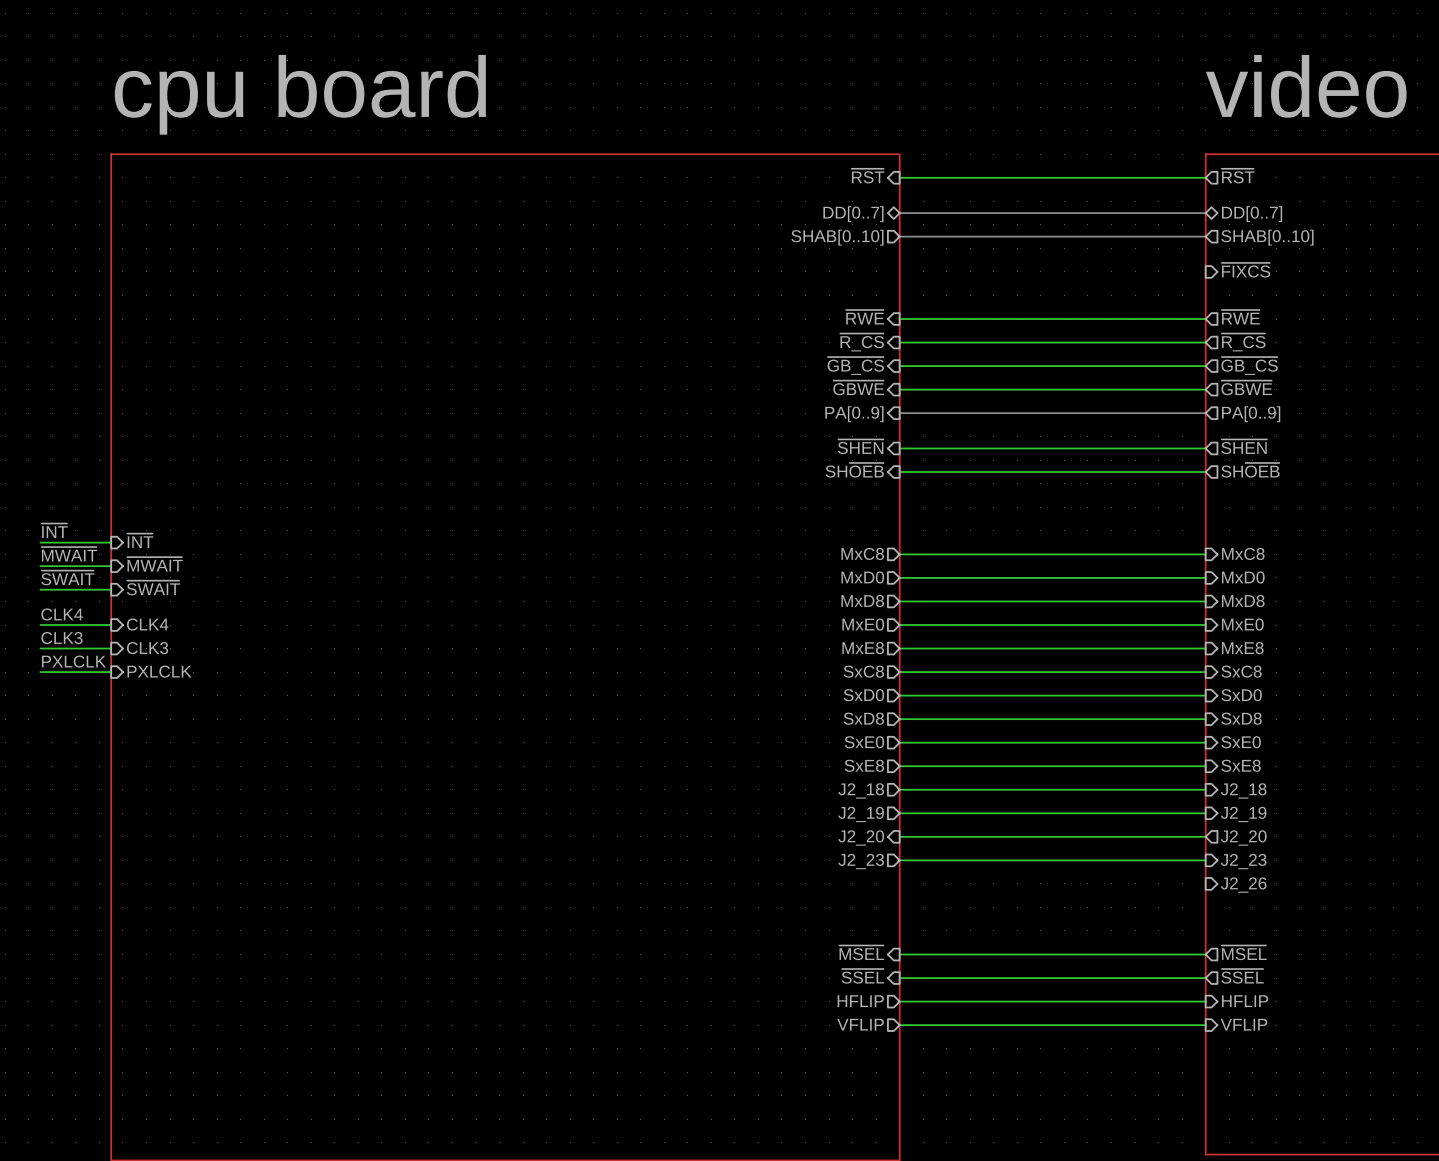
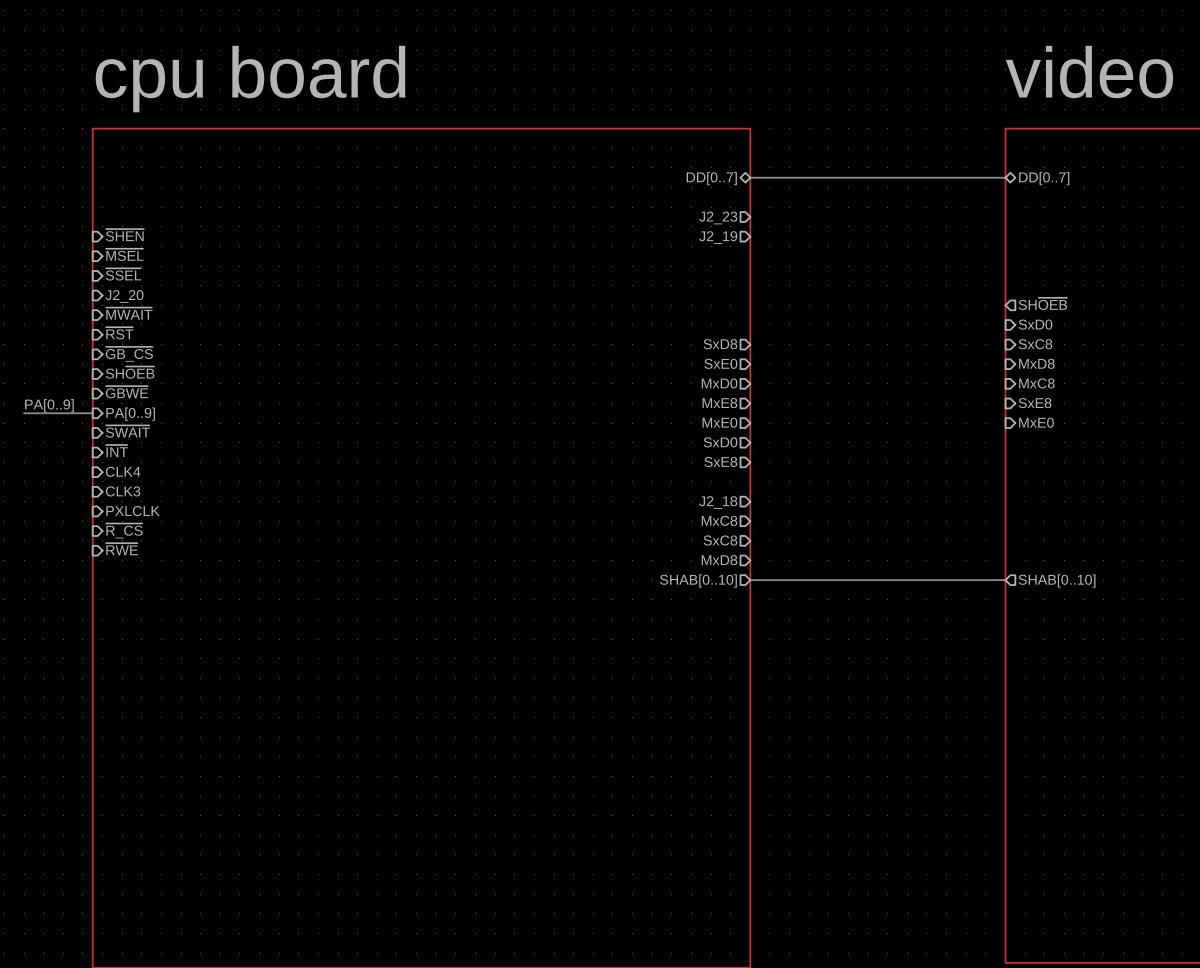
sheet pin: ~{RST} (868, 176) -> none
sheet pin: ~{RST} (1238, 176) -> none
wire: (899, 177) (1205, 177) -> none
bus: (899, 236) (1205, 236) -> none
sheet pin: SHAB[0..10] (837, 237) -> none
sheet pin: SHAB[0..10] (1267, 237) -> none
sheet pin: none -> J2_23 (718, 217)
sheet pin: ~{FIXCS} (1245, 270) -> none
sheet pin: none -> ~{SHEN} (124, 235)
sheet pin: none -> J2_19 (718, 237)
sheet pin: none -> ~{MSEL} (124, 254)
sheet pin: ~{RWE} (865, 317) -> none
sheet pin: ~{RWE} (1240, 317) -> none
wire: (899, 319) (1205, 319) -> none
sheet pin: none -> ~{SSEL} (123, 274)
sheet pin: ~{R_CS} (862, 342) -> none
wire: (899, 342) (1205, 342) -> none
sheet pin: ~{R_CS} (1243, 342) -> none
sheet pin: none -> J2_20 (124, 296)
sheet pin: ~{GB_CS} (855, 366) -> none
wire: (899, 366) (1205, 366) -> none
sheet pin: ~{GB_CS} (1249, 366) -> SH~{OEB} (1042, 303)
sheet pin: none -> ~{MWAIT} (129, 313)
sheet pin: ~{GBWE} (858, 387) -> none
sheet pin shape: output (1246, 387) -> input (1035, 324)
sheet pin: ~{GBWE} (1246, 387) -> SxD0 (1035, 324)
wire: (899, 389) (1205, 389) -> none
sheet pin: none -> ~{RST} (119, 333)
bus: (899, 413) (1205, 413) -> none
sheet pin shape: input (854, 414) -> output (720, 344)
sheet pin: PA[0..9] (854, 414) -> SxD8 (720, 344)
sheet pin shape: output (1251, 414) -> input (1035, 344)
sheet pin: PA[0..9] (1251, 414) -> SxC8 (1035, 344)
sheet pin: none -> ~{GB_CS} (129, 354)
sheet pin: none -> SxE0 (720, 363)
sheet pin: none -> SH~{OEB} (130, 372)
sheet pin: ~{SHEN} (860, 446) -> none
sheet pin: ~{SHEN} (1244, 446) -> none
wire: (899, 448) (1205, 448) -> none
sheet pin: none -> ~{GBWE} (127, 392)
sheet pin: SH~{OEB} (854, 470) -> none
sheet pin: SH~{OEB} (1250, 470) -> none
wire: (899, 472) (1205, 472) -> none
sheet pin: none -> MxE8 (719, 403)
sheet pin: none -> SxE8 (1035, 403)
label: none -> PA[0..9] (49, 405)
bus: none -> (24, 413) (92, 413)
sheet pin: none -> PA[0..9] (130, 414)
sheet pin: none -> MxE0 (719, 422)
sheet pin: none -> ~{SWAIT} (127, 431)
label: ~{INT} (54, 530) -> none
sheet pin: none -> SxD0 (720, 442)
wire: (40, 542) (111, 542) -> none
sheet pin: MxC8 (862, 553) -> SxE8 (720, 461)
sheet pin position: MxC8 (1243, 553) -> MxC8 (1036, 383)
label: ~{MWAIT} (69, 554) -> none
wire: (899, 554) (1205, 554) -> none
sheet pin: ~{MWAIT} (155, 564) -> CLK4 (123, 471)
wire: (40, 566) (111, 566) -> none
label: ~{SWAIT} (67, 577) -> none
sheet pin position: MxD0 (862, 577) -> MxD0 (719, 383)
wire: (899, 577) (1205, 577) -> none
sheet pin: MxD0 (1243, 577) -> none
sheet pin: ~{SWAIT} (153, 587) -> CLK3 (123, 491)
wire: (40, 589) (111, 589) -> none
sheet pin: MxD8 (862, 601) -> J2_18 (718, 502)
wire: (899, 601) (1205, 601) -> none
sheet pin position: MxD8 (1243, 601) -> MxD8 (1036, 363)
label: CLK4 (62, 614) -> none
sheet pin: CLK4 (147, 624) -> none
sheet pin: MxE0 (863, 624) -> MxC8 (719, 520)
sheet pin position: MxE0 (1242, 624) -> MxE0 (1036, 422)
wire: (40, 625) (111, 625) -> none
wire: (899, 625) (1205, 625) -> none
sheet pin: none -> ~{R_CS} (124, 530)
label: CLK3 (62, 638) -> none
wire: (40, 648) (111, 648) -> none
sheet pin: CLK3 (147, 648) -> none
sheet pin: MxE8 (863, 648) -> SxC8 (720, 540)
wire: (899, 648) (1205, 648) -> none
sheet pin: MxE8 (1242, 648) -> none
sheet pin: none -> ~{RWE} (122, 549)
label: PXLCLK (73, 661) -> none
sheet pin position: PXLCLK (159, 671) -> PXLCLK (133, 511)
sheet pin: SxC8 (863, 671) -> MxD8 (719, 560)
sheet pin: SxC8 (1241, 671) -> none
wire: (40, 672) (111, 672) -> none
wire: (899, 672) (1205, 672) -> none
sheet pin: SxD0 (863, 695) -> SHAB[0..10] (698, 580)
bus: none -> (750, 580) (1005, 580)
sheet pin shape: input (1241, 695) -> output (1057, 580)
sheet pin: SxD0 (1241, 695) -> SHAB[0..10] (1057, 580)
sheet pin: SxD8 (863, 718) -> none
sheet pin: SxD8 (1241, 718) -> none
wire: (899, 719) (1205, 719) -> none
sheet pin: SxE0 (864, 742) -> none
wire: (899, 742) (1205, 742) -> none
sheet pin: SxE0 (1241, 742) -> none
sheet pin: SxE8 (864, 765) -> none
sheet pin: SxE8 (1241, 765) -> none
wire: (899, 766) (1205, 766) -> none
wire: (899, 789) (1205, 789) -> none
sheet pin: J2_18 (861, 790) -> none
sheet pin: J2_18 (1243, 790) -> none
wire: (899, 813) (1205, 813) -> none
sheet pin: J2_19 (861, 814) -> none
sheet pin: J2_19 (1243, 814) -> none
wire: (899, 836) (1205, 836) -> none
sheet pin: J2_20 (861, 838) -> none
sheet pin: J2_20 (1243, 838) -> none
wire: (899, 860) (1205, 860) -> none
sheet pin: J2_23 (861, 861) -> none
sheet pin: J2_23 (1243, 861) -> none
sheet pin: J2_26 (1243, 885) -> none
sheet pin: ~{MSEL} (861, 952) -> none
sheet pin: ~{MSEL} (1244, 952) -> none
wire: (899, 954) (1205, 954) -> none
sheet pin: ~{SSEL} (862, 976) -> none
sheet pin: ~{SSEL} (1242, 976) -> none
wire: (899, 978) (1205, 978) -> none
sheet pin: HFLIP (860, 1001) -> none
wire: (899, 1001) (1205, 1001) -> none
sheet pin: HFLIP (1245, 1001) -> none
sheet pin: VFLIP (860, 1024) -> none
sheet pin: VFLIP (1243, 1024) -> none
wire: (899, 1025) (1205, 1025) -> none

